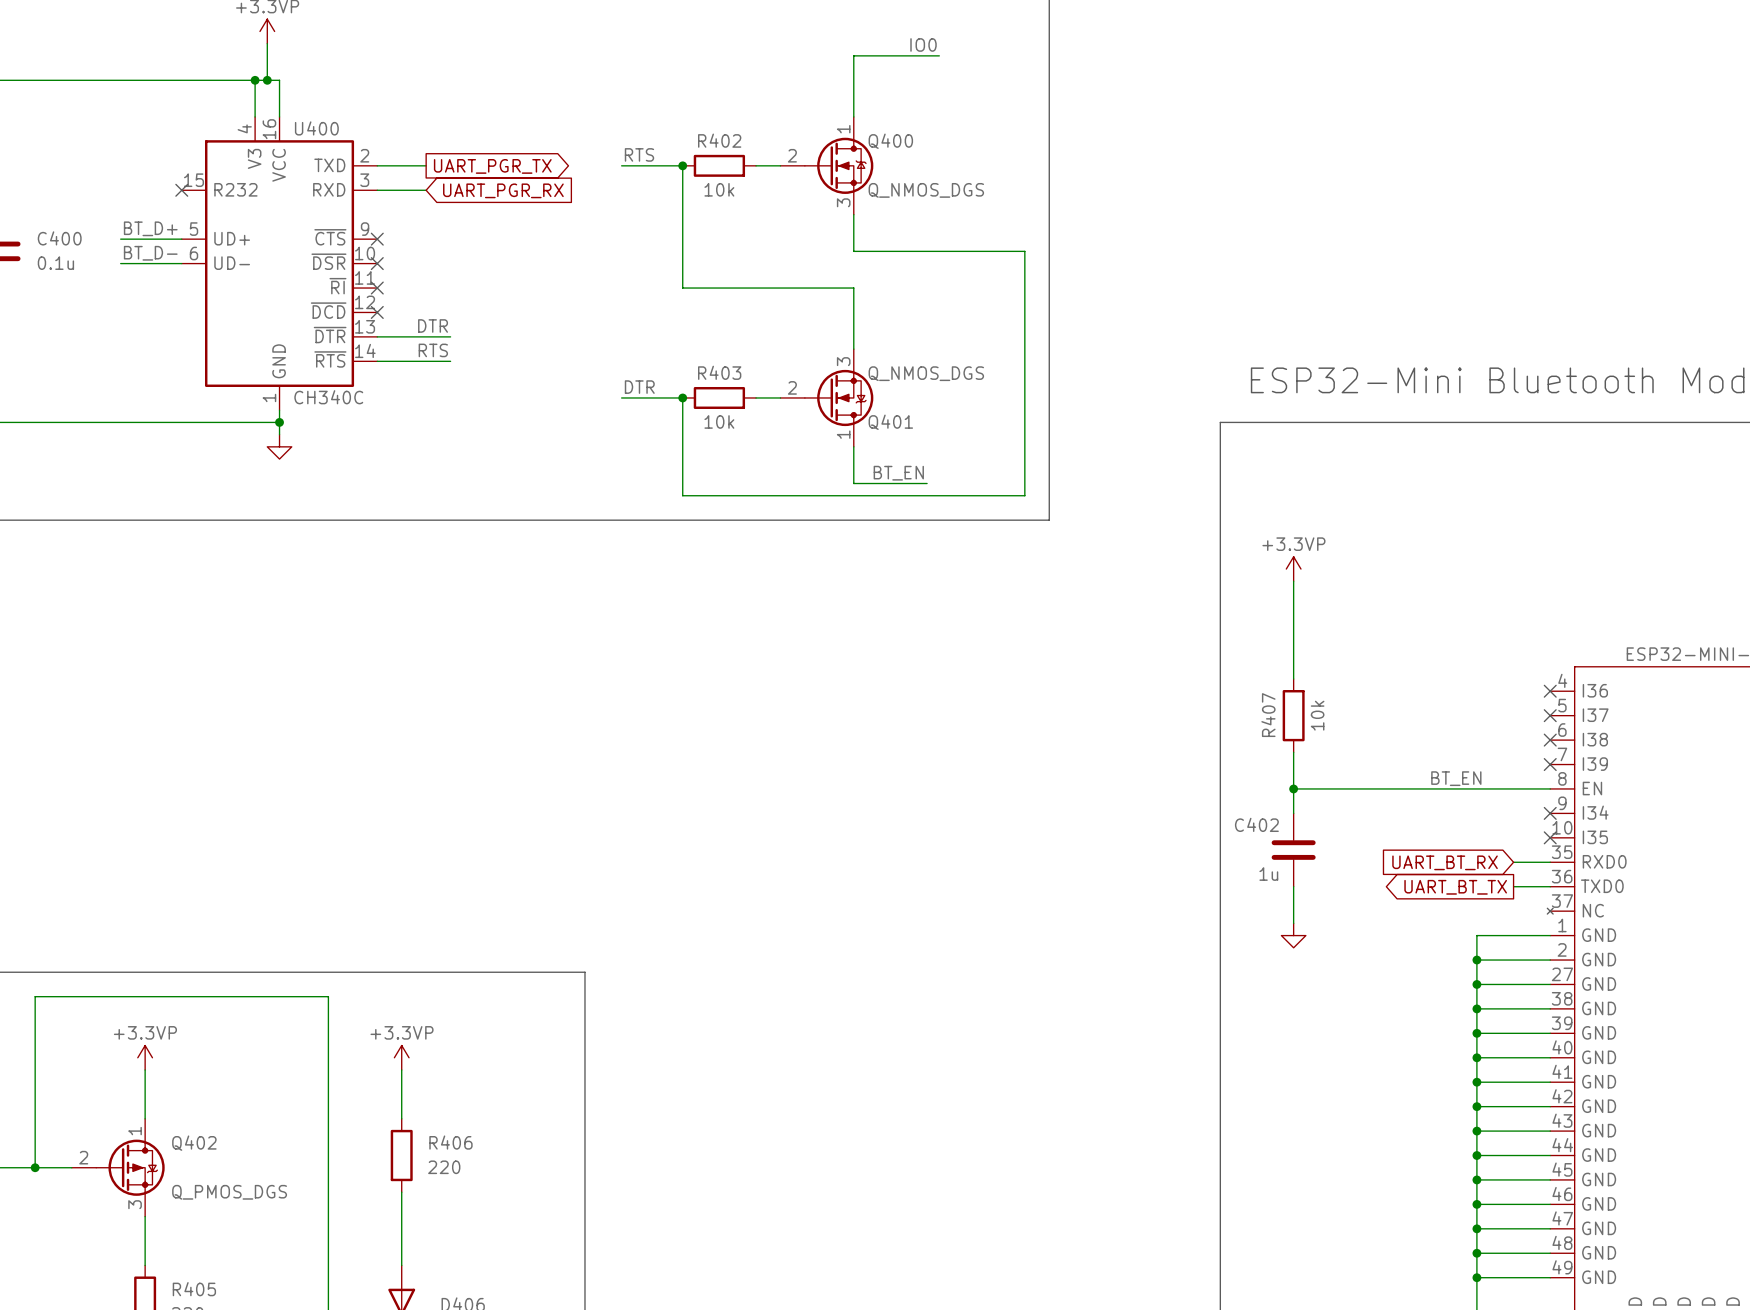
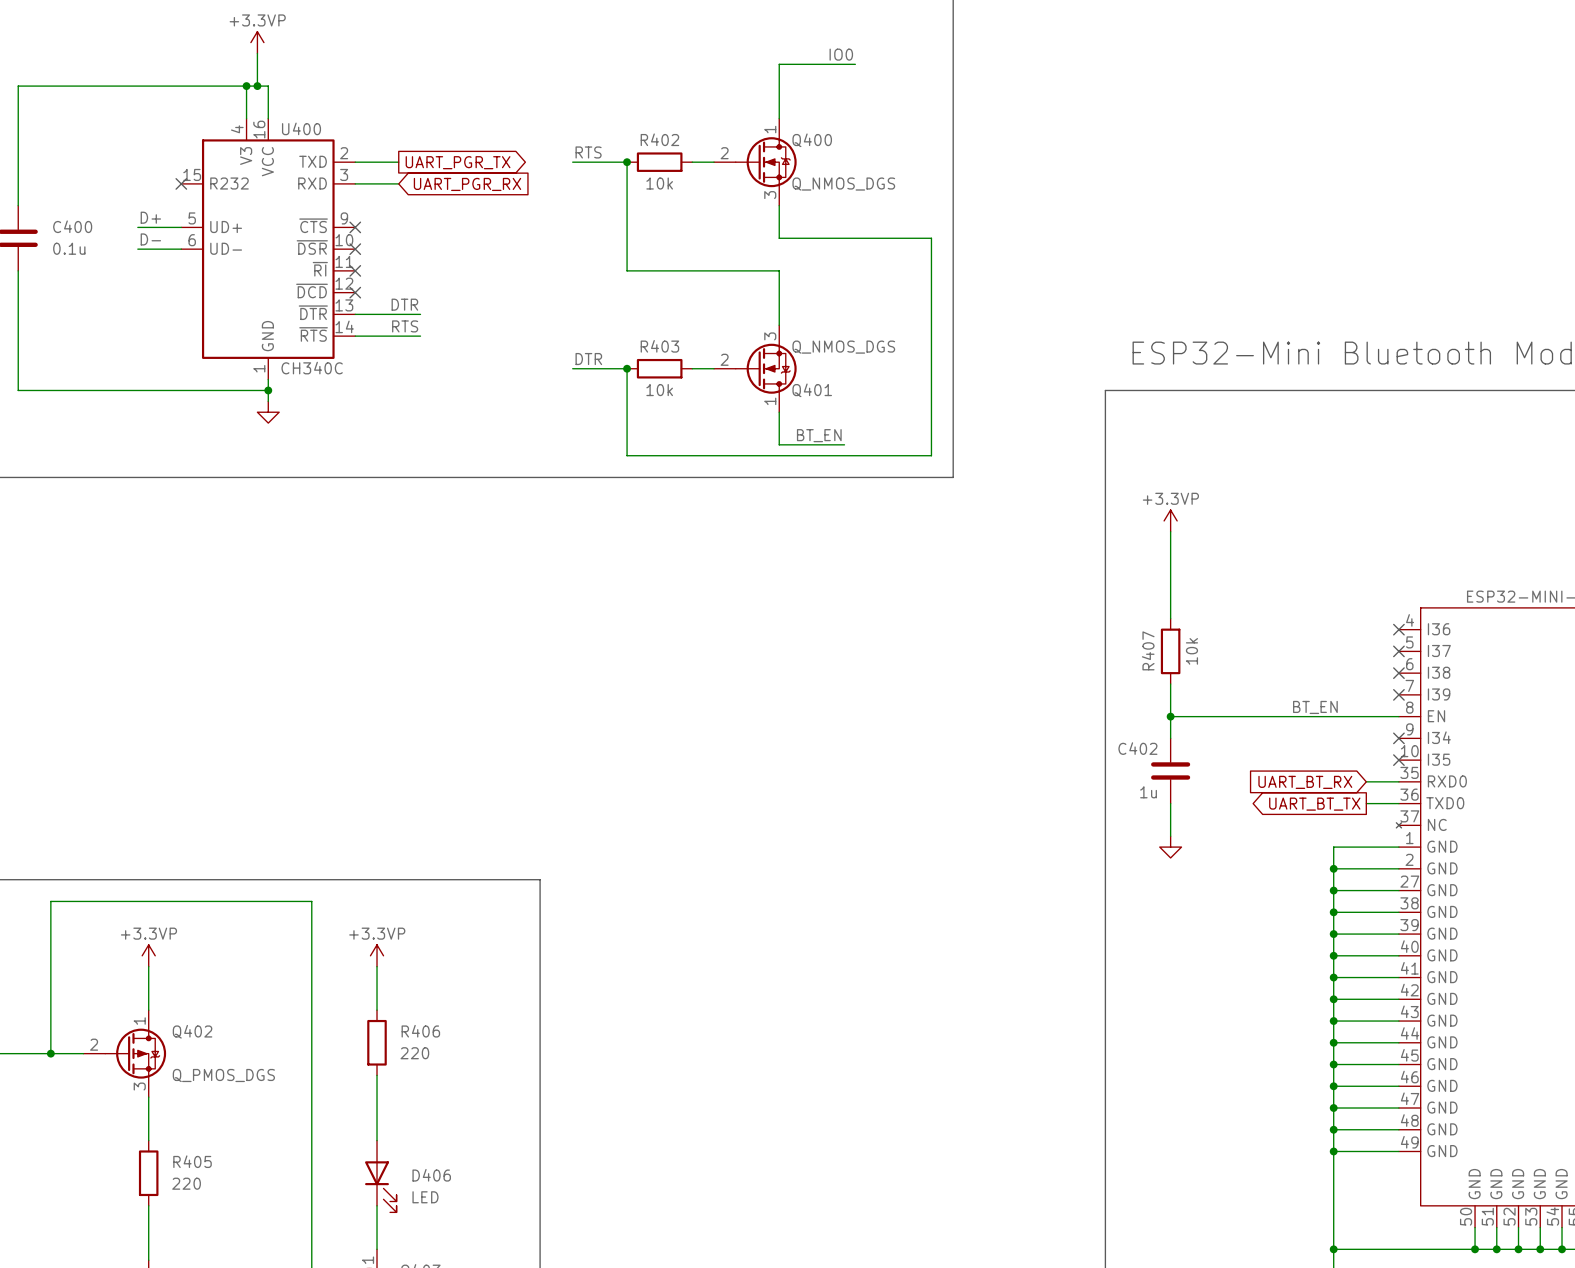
label: none -> D+ (150, 217)
label: BT_D+ (150, 228) -> none
wire: (120, 239) (132, 239) -> none
label: none -> D- (150, 239)
label: BT_D- (150, 253) -> none
wire: (120, 263) (132, 263) -> none

